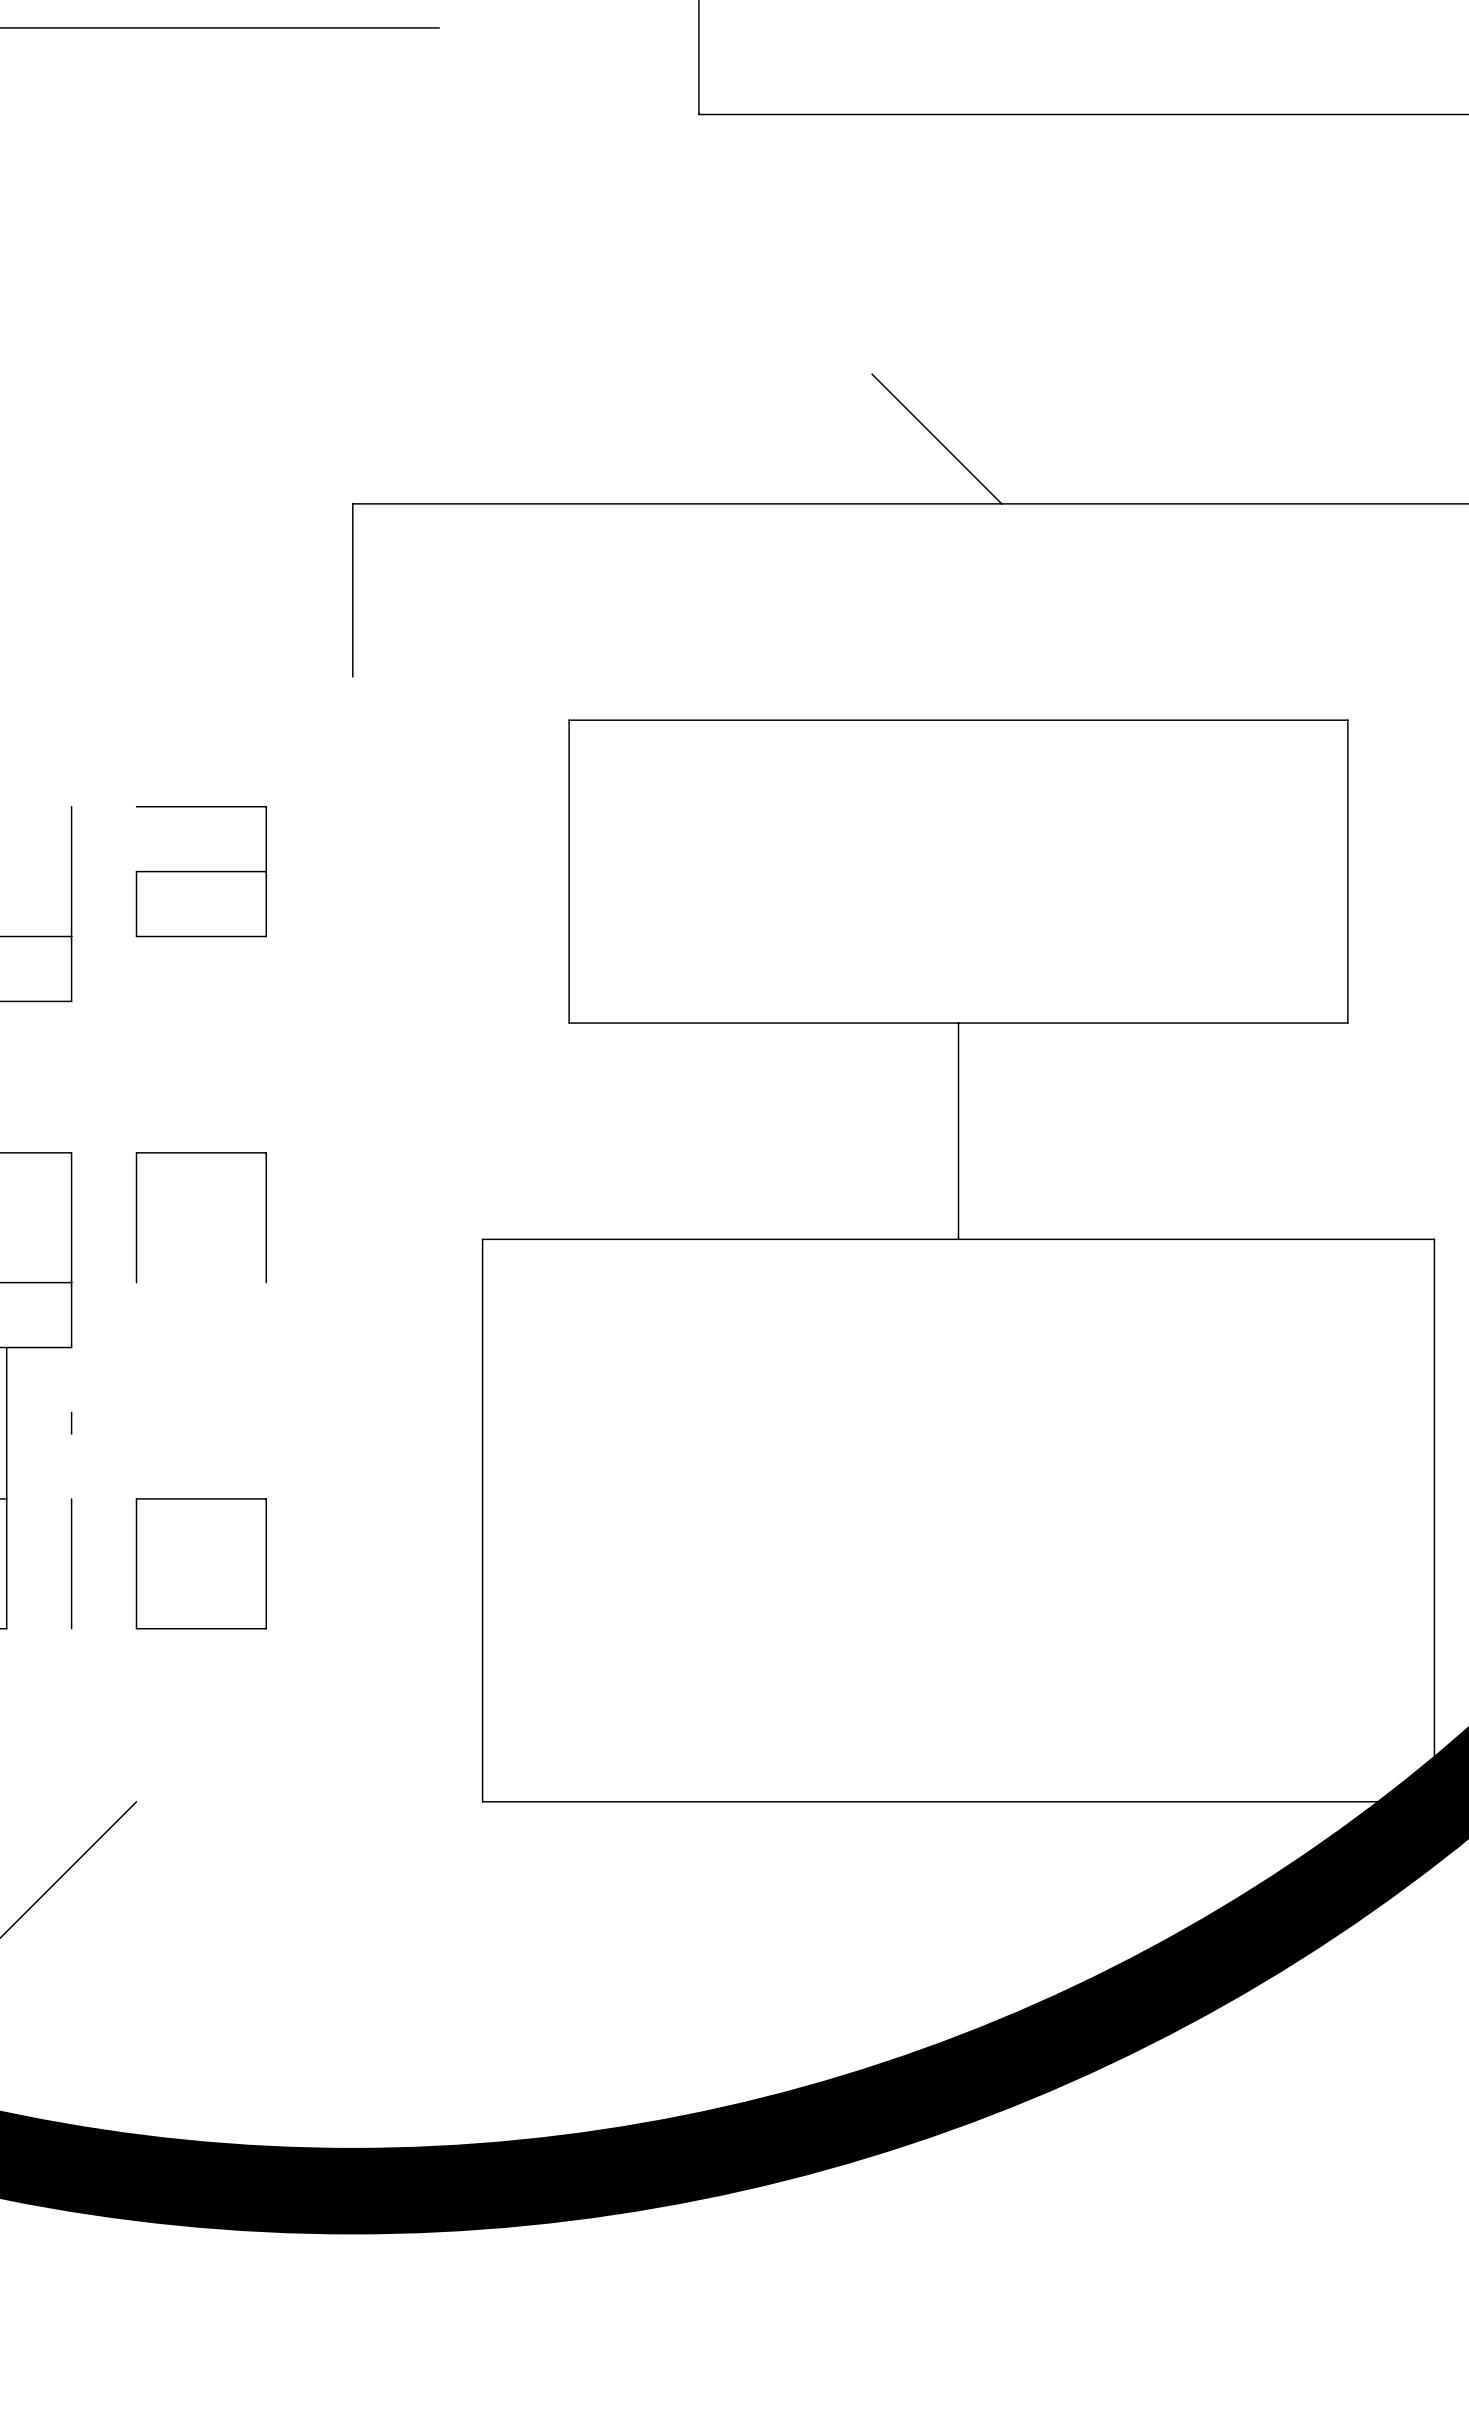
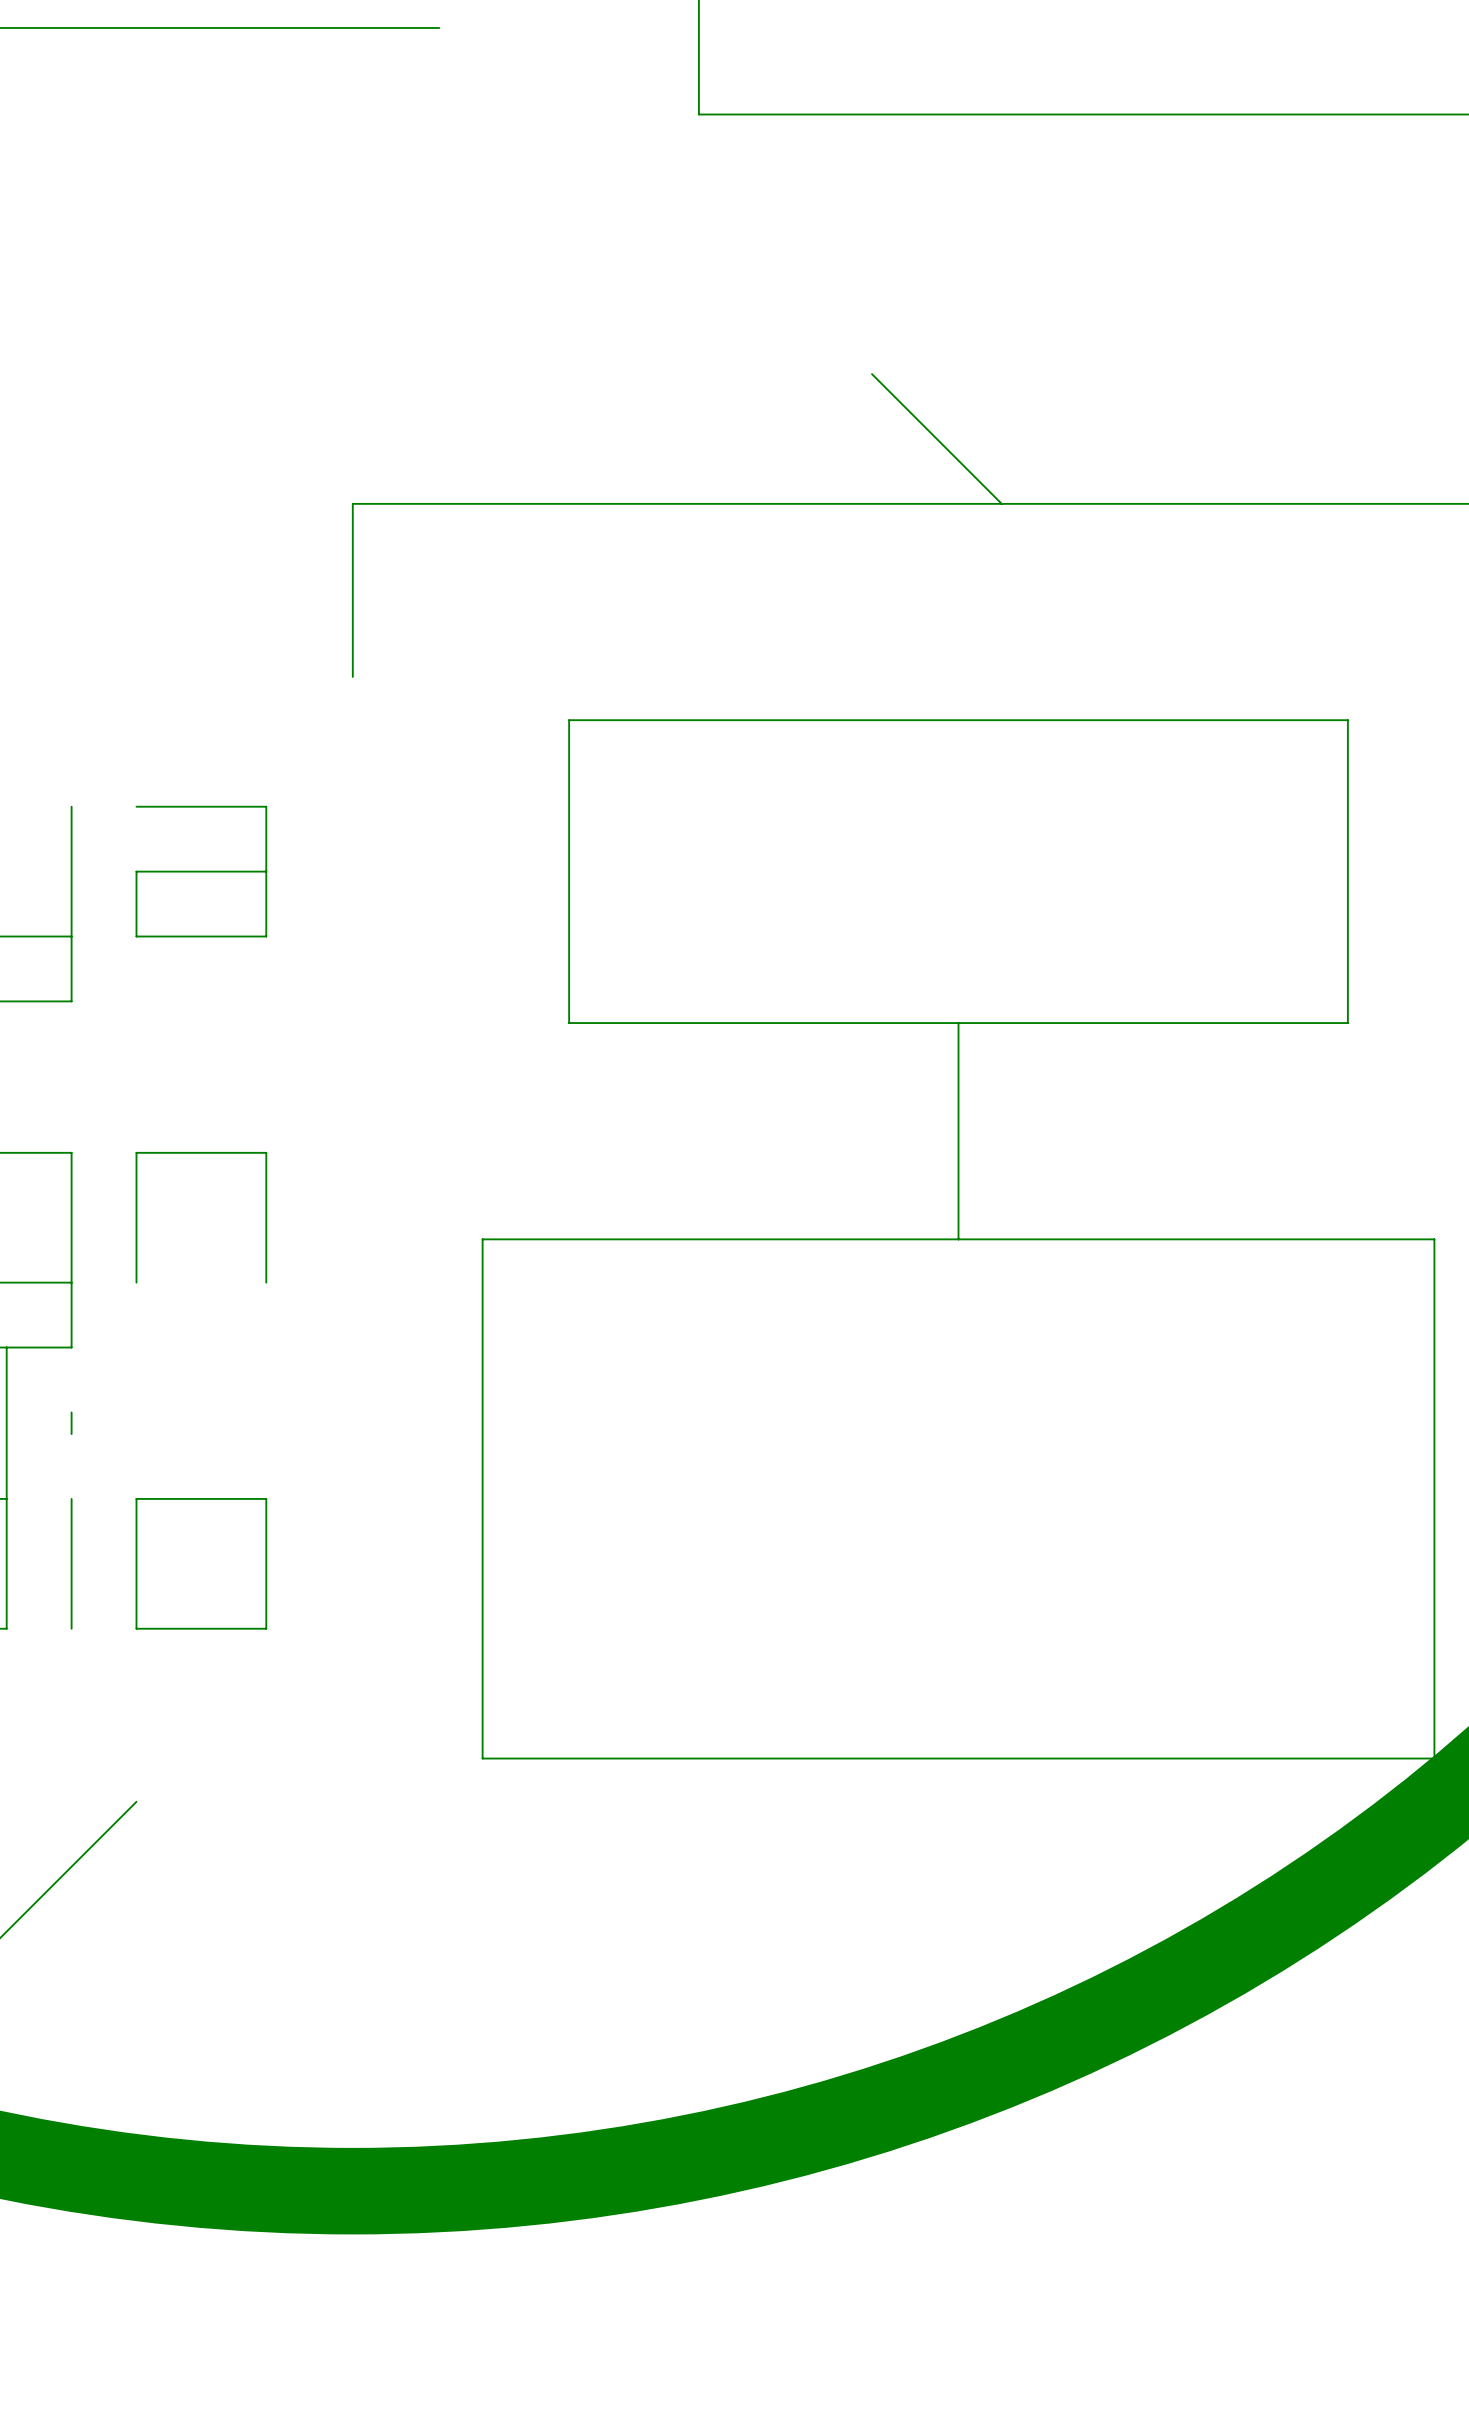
wire: (482, 1758) (482, 1801) (1434, 1801) (1434, 1758) -> (482, 1758) (1434, 1758)

